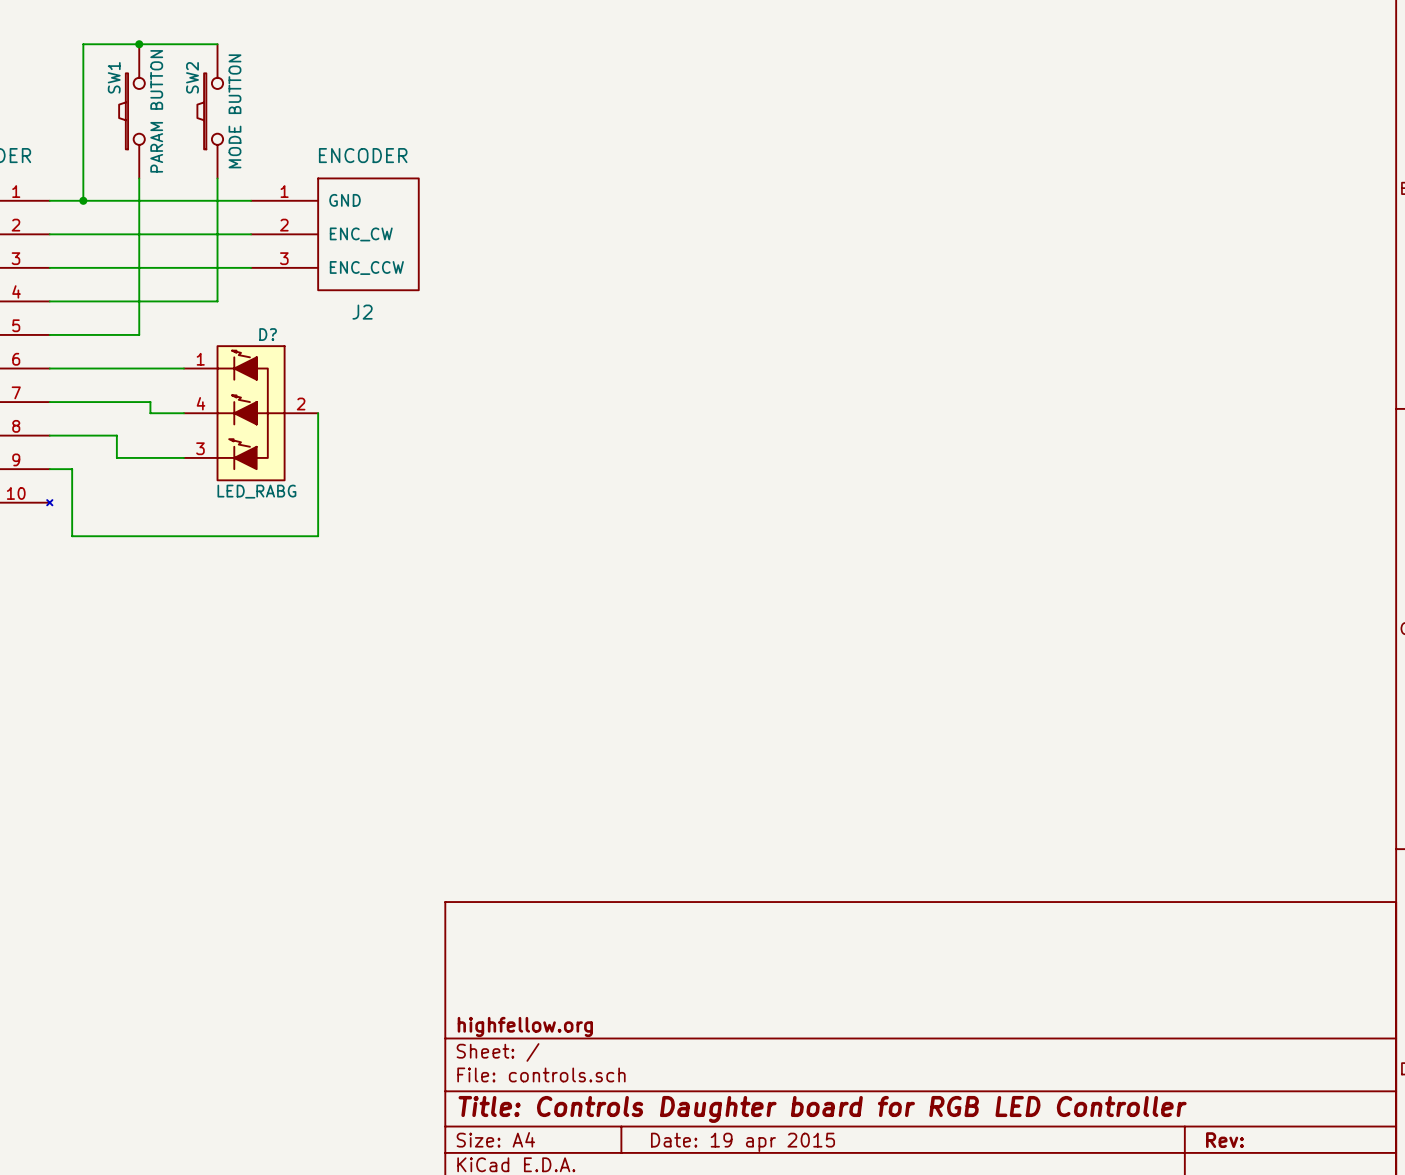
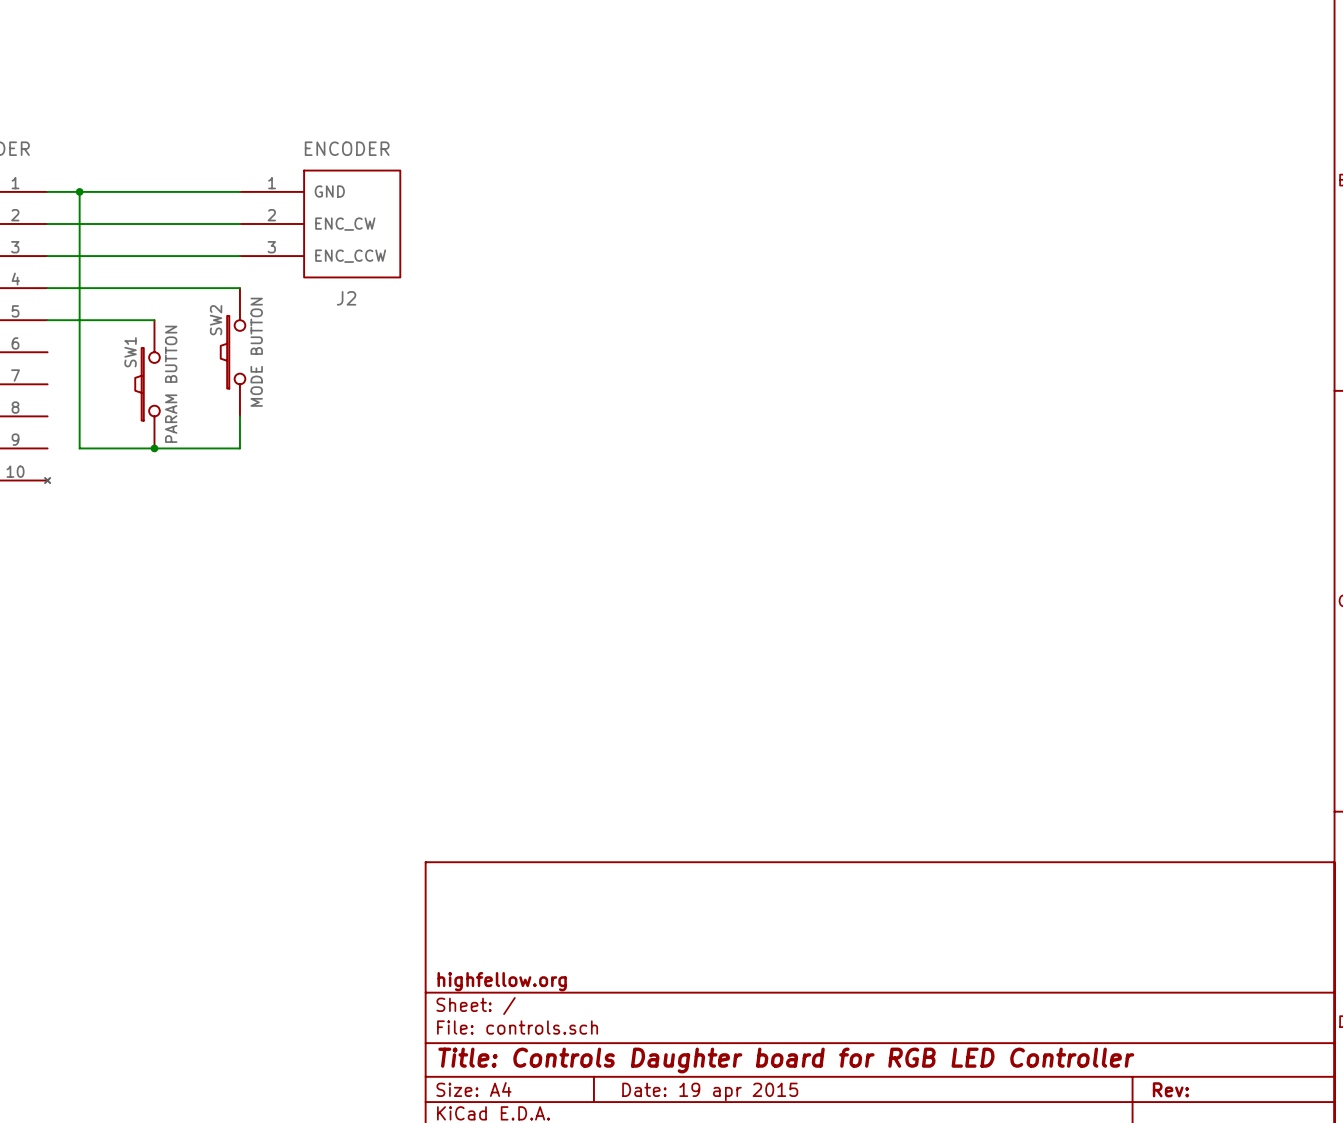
junction: (139, 44) -> none
wire: (217, 44) (83, 44) (83, 200) -> (239, 416) (239, 448) (79, 448) (79, 191)
SW1 position: (131, 111) -> (147, 384)
SW2 position: (210, 111) -> (233, 352)
wire: (139, 178) (139, 334) -> (154, 320) (133, 320)
wire: (217, 178) (217, 301) -> (239, 288) (207, 288)
wire: (49, 368) (183, 368) -> none
wire: (49, 402) (150, 402) (150, 413) (183, 413) -> none
D?: LED_RABG (251, 413) -> none
wire: (318, 413) (318, 536) (72, 536) (72, 469) (49, 469) -> none
wire: (49, 435) (116, 435) (116, 457) (183, 457) -> none
junction: none -> (154, 448)

